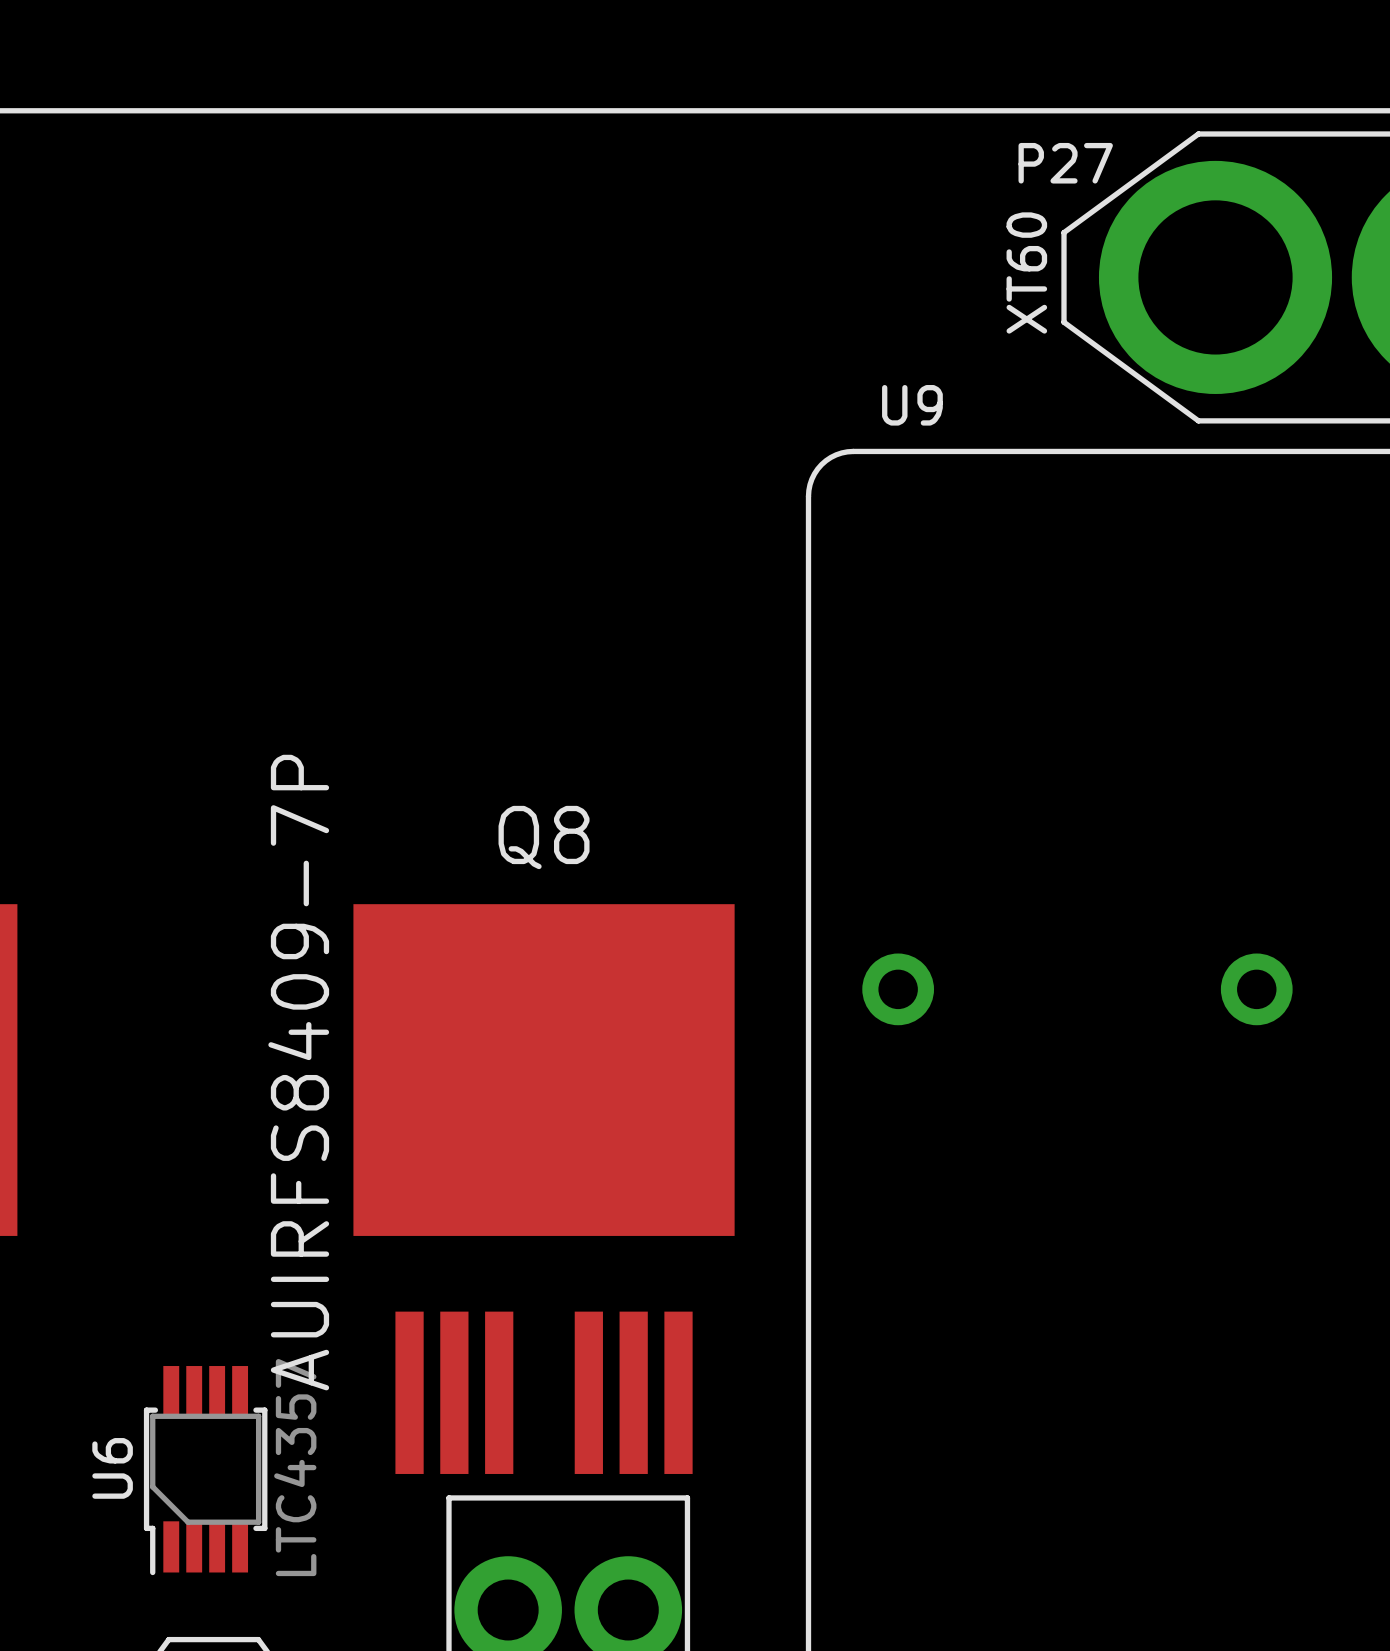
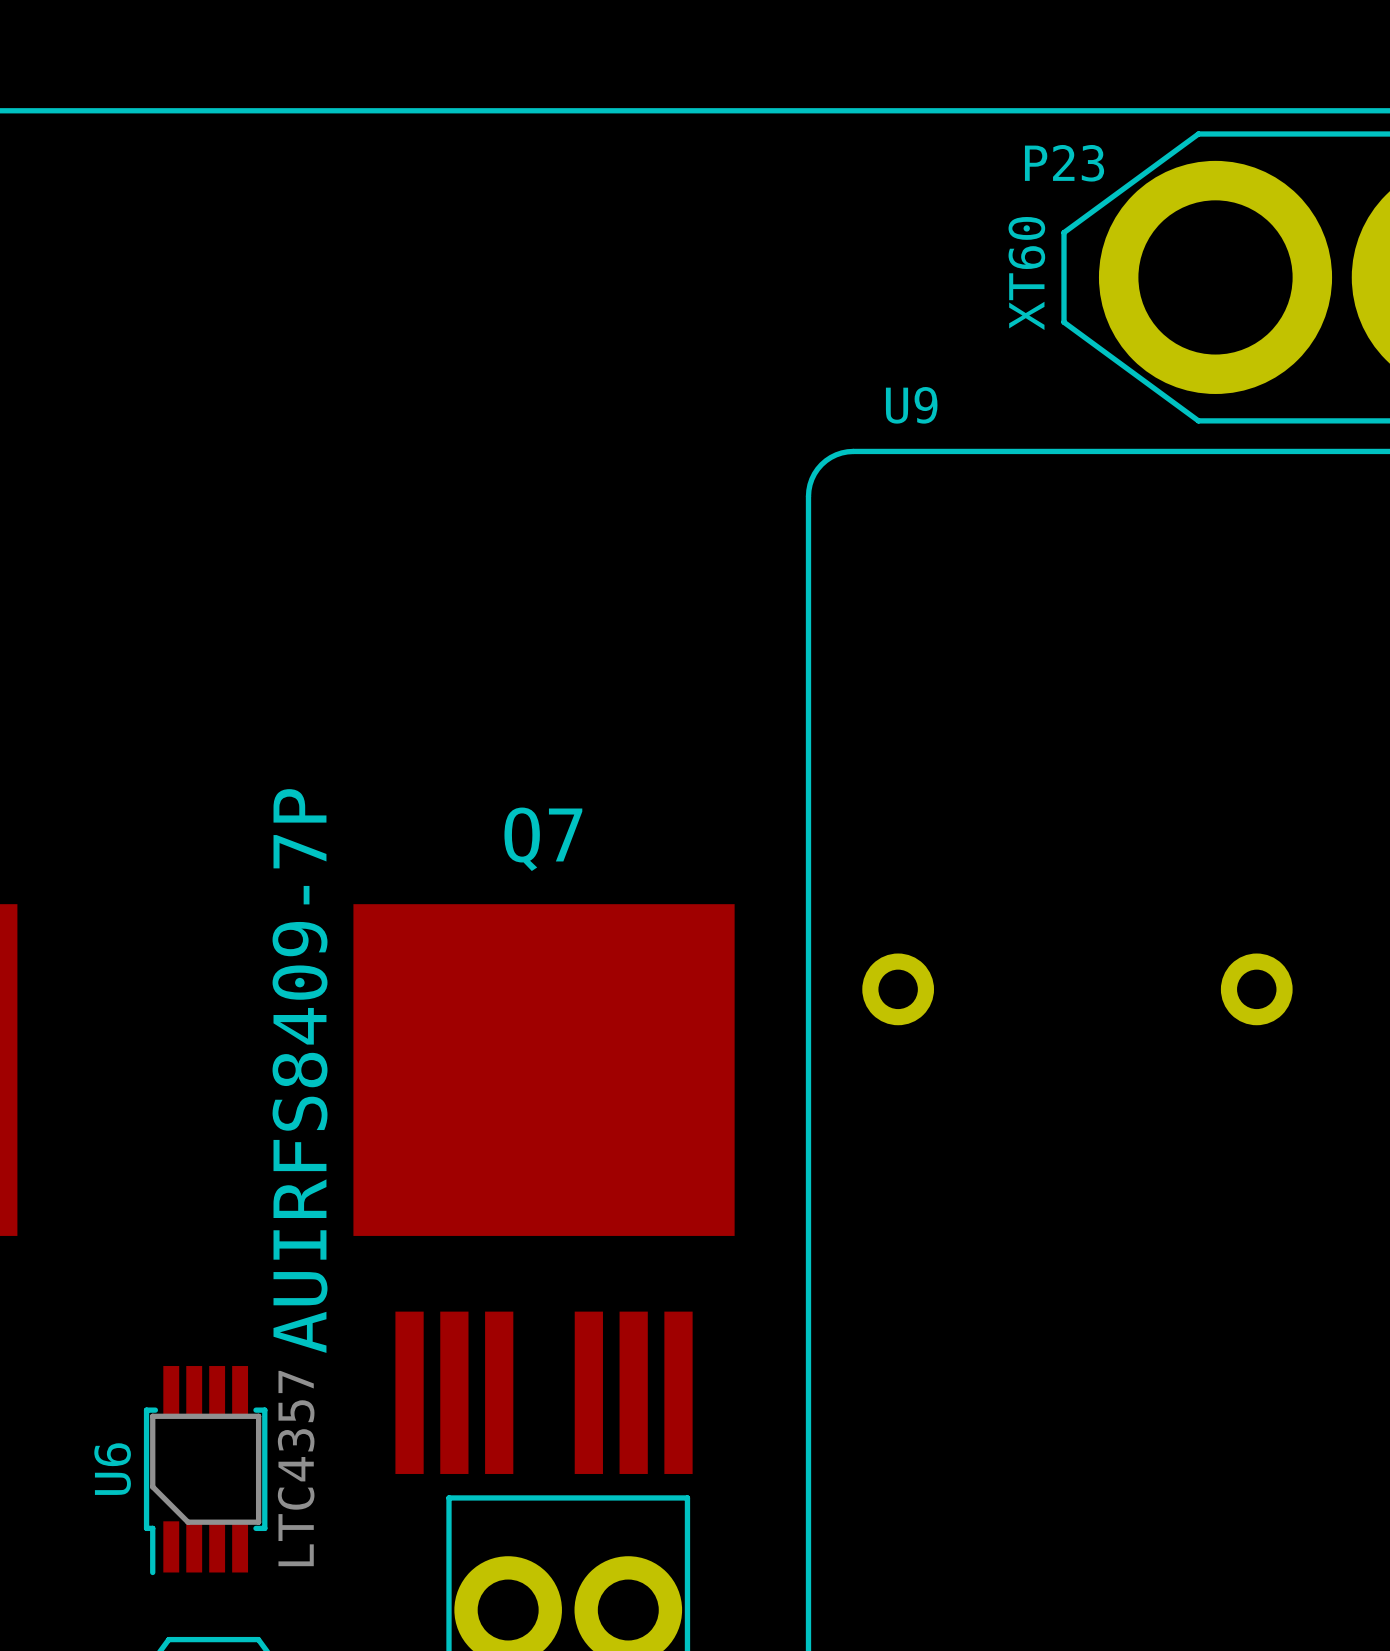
P27 name: P27 (1065, 163) -> P23 (1064, 163)
Q8 name: Q8 (544, 837) -> Q7 (543, 839)

